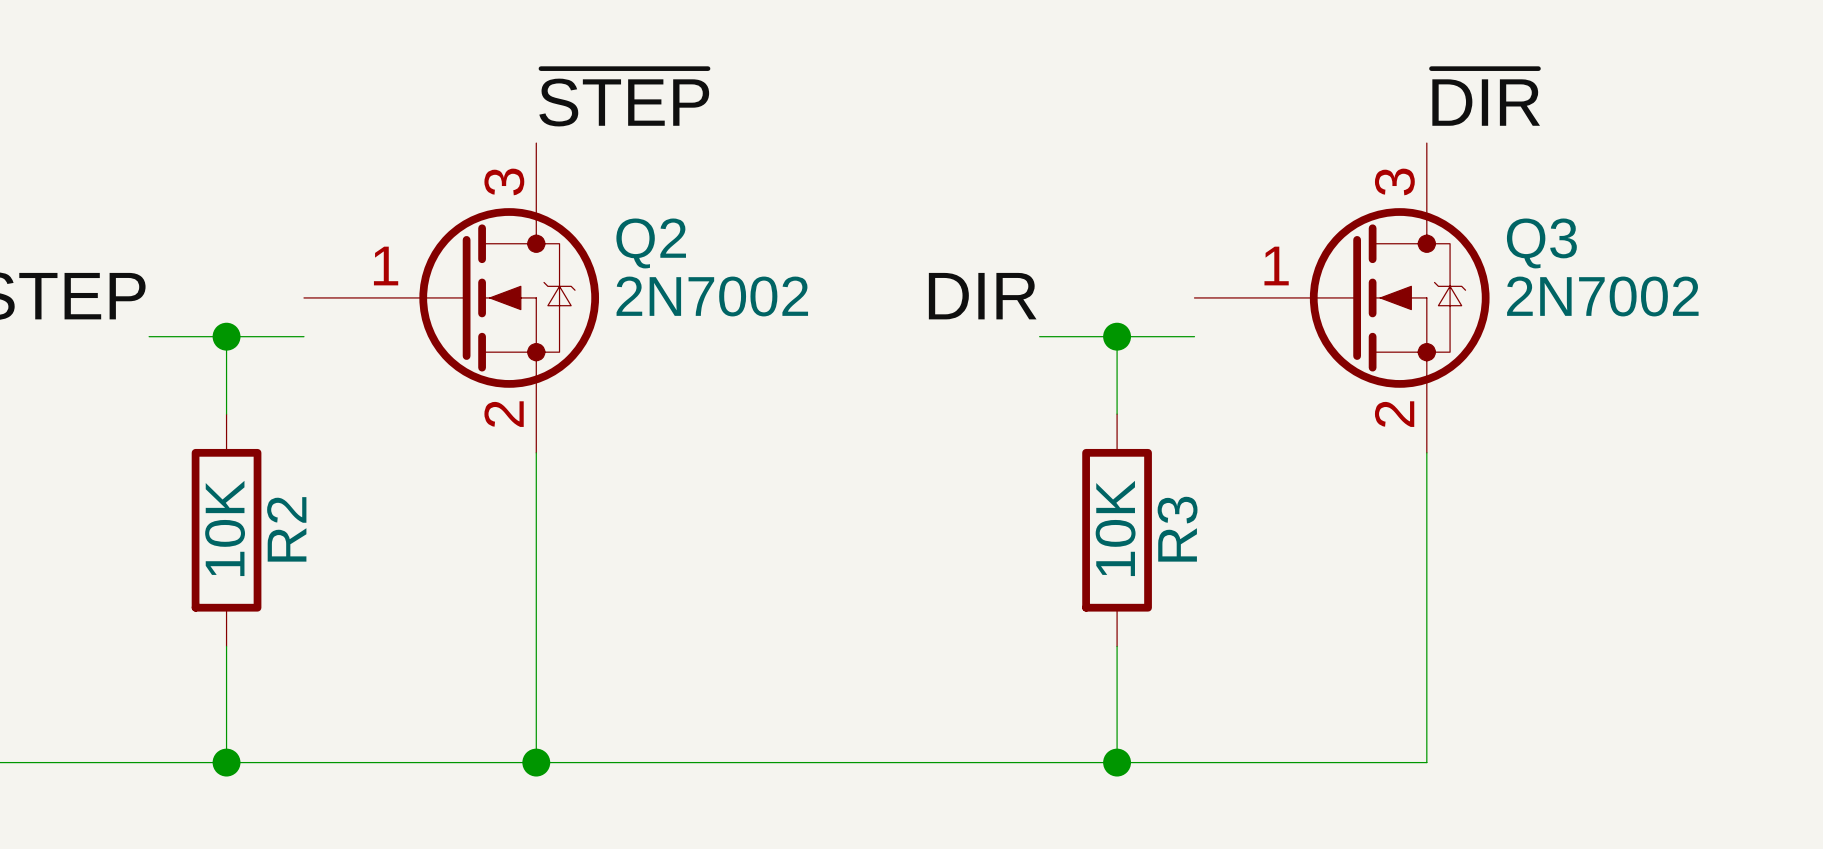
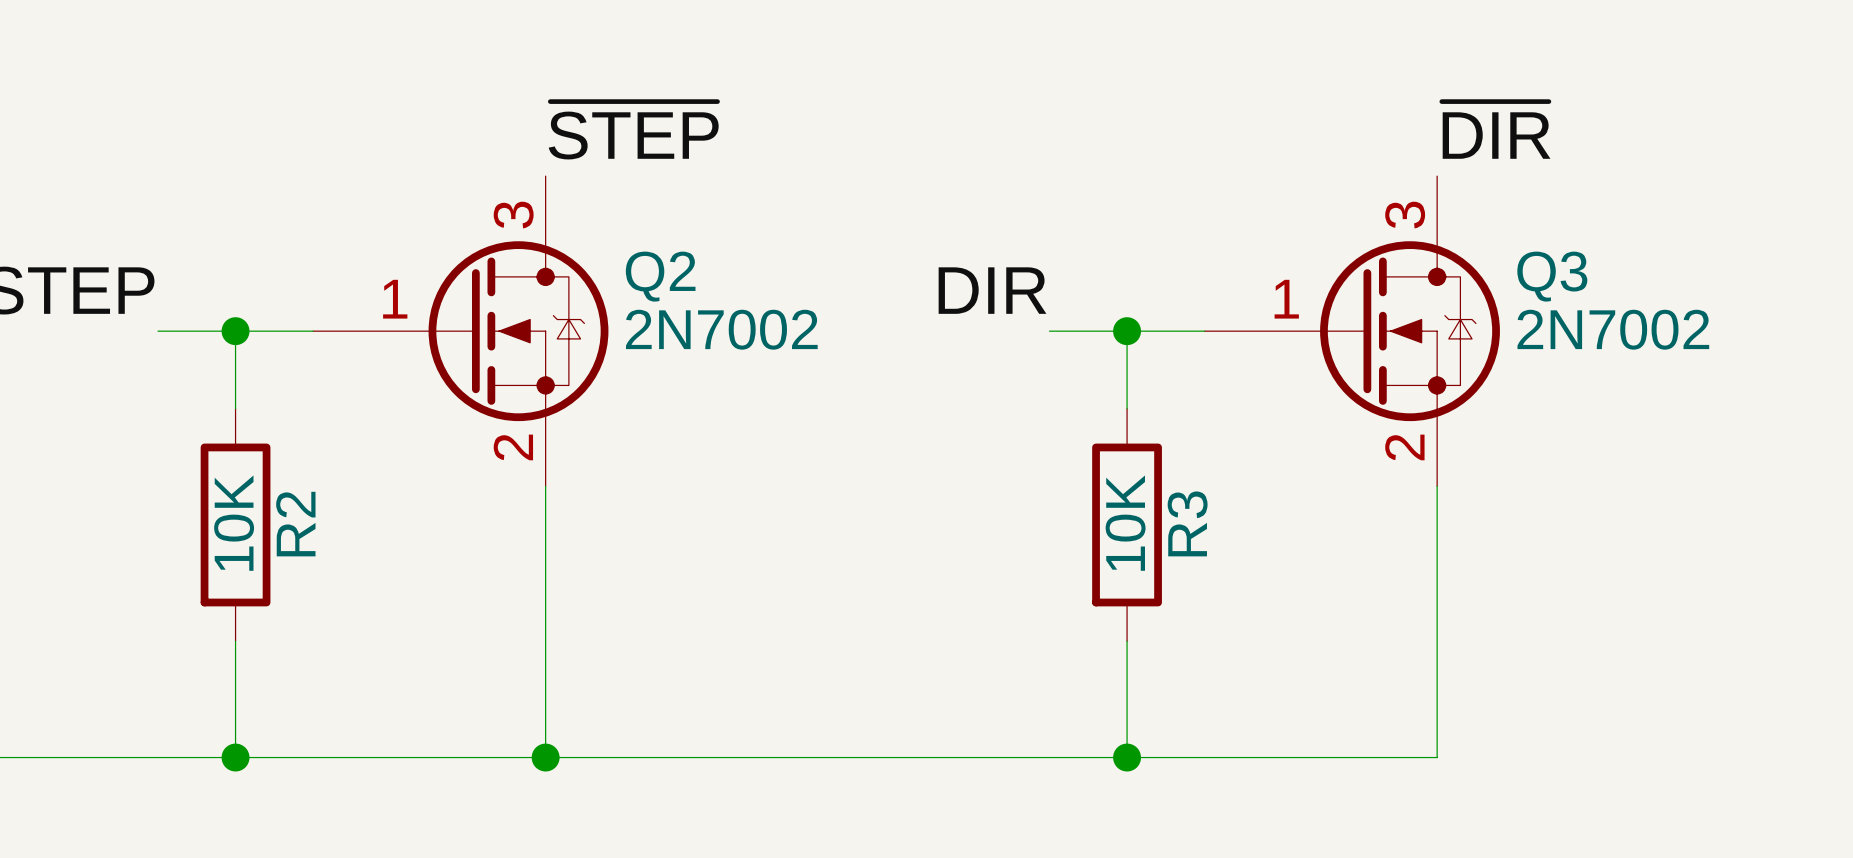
label position: ~{STEP} (624, 97) -> ~{STEP} (633, 130)
label position: ~{DIR} (1485, 97) -> ~{DIR} (1496, 130)
Q2 position: (451, 297) -> (460, 331)
Q3 position: (1342, 297) -> (1352, 331)

